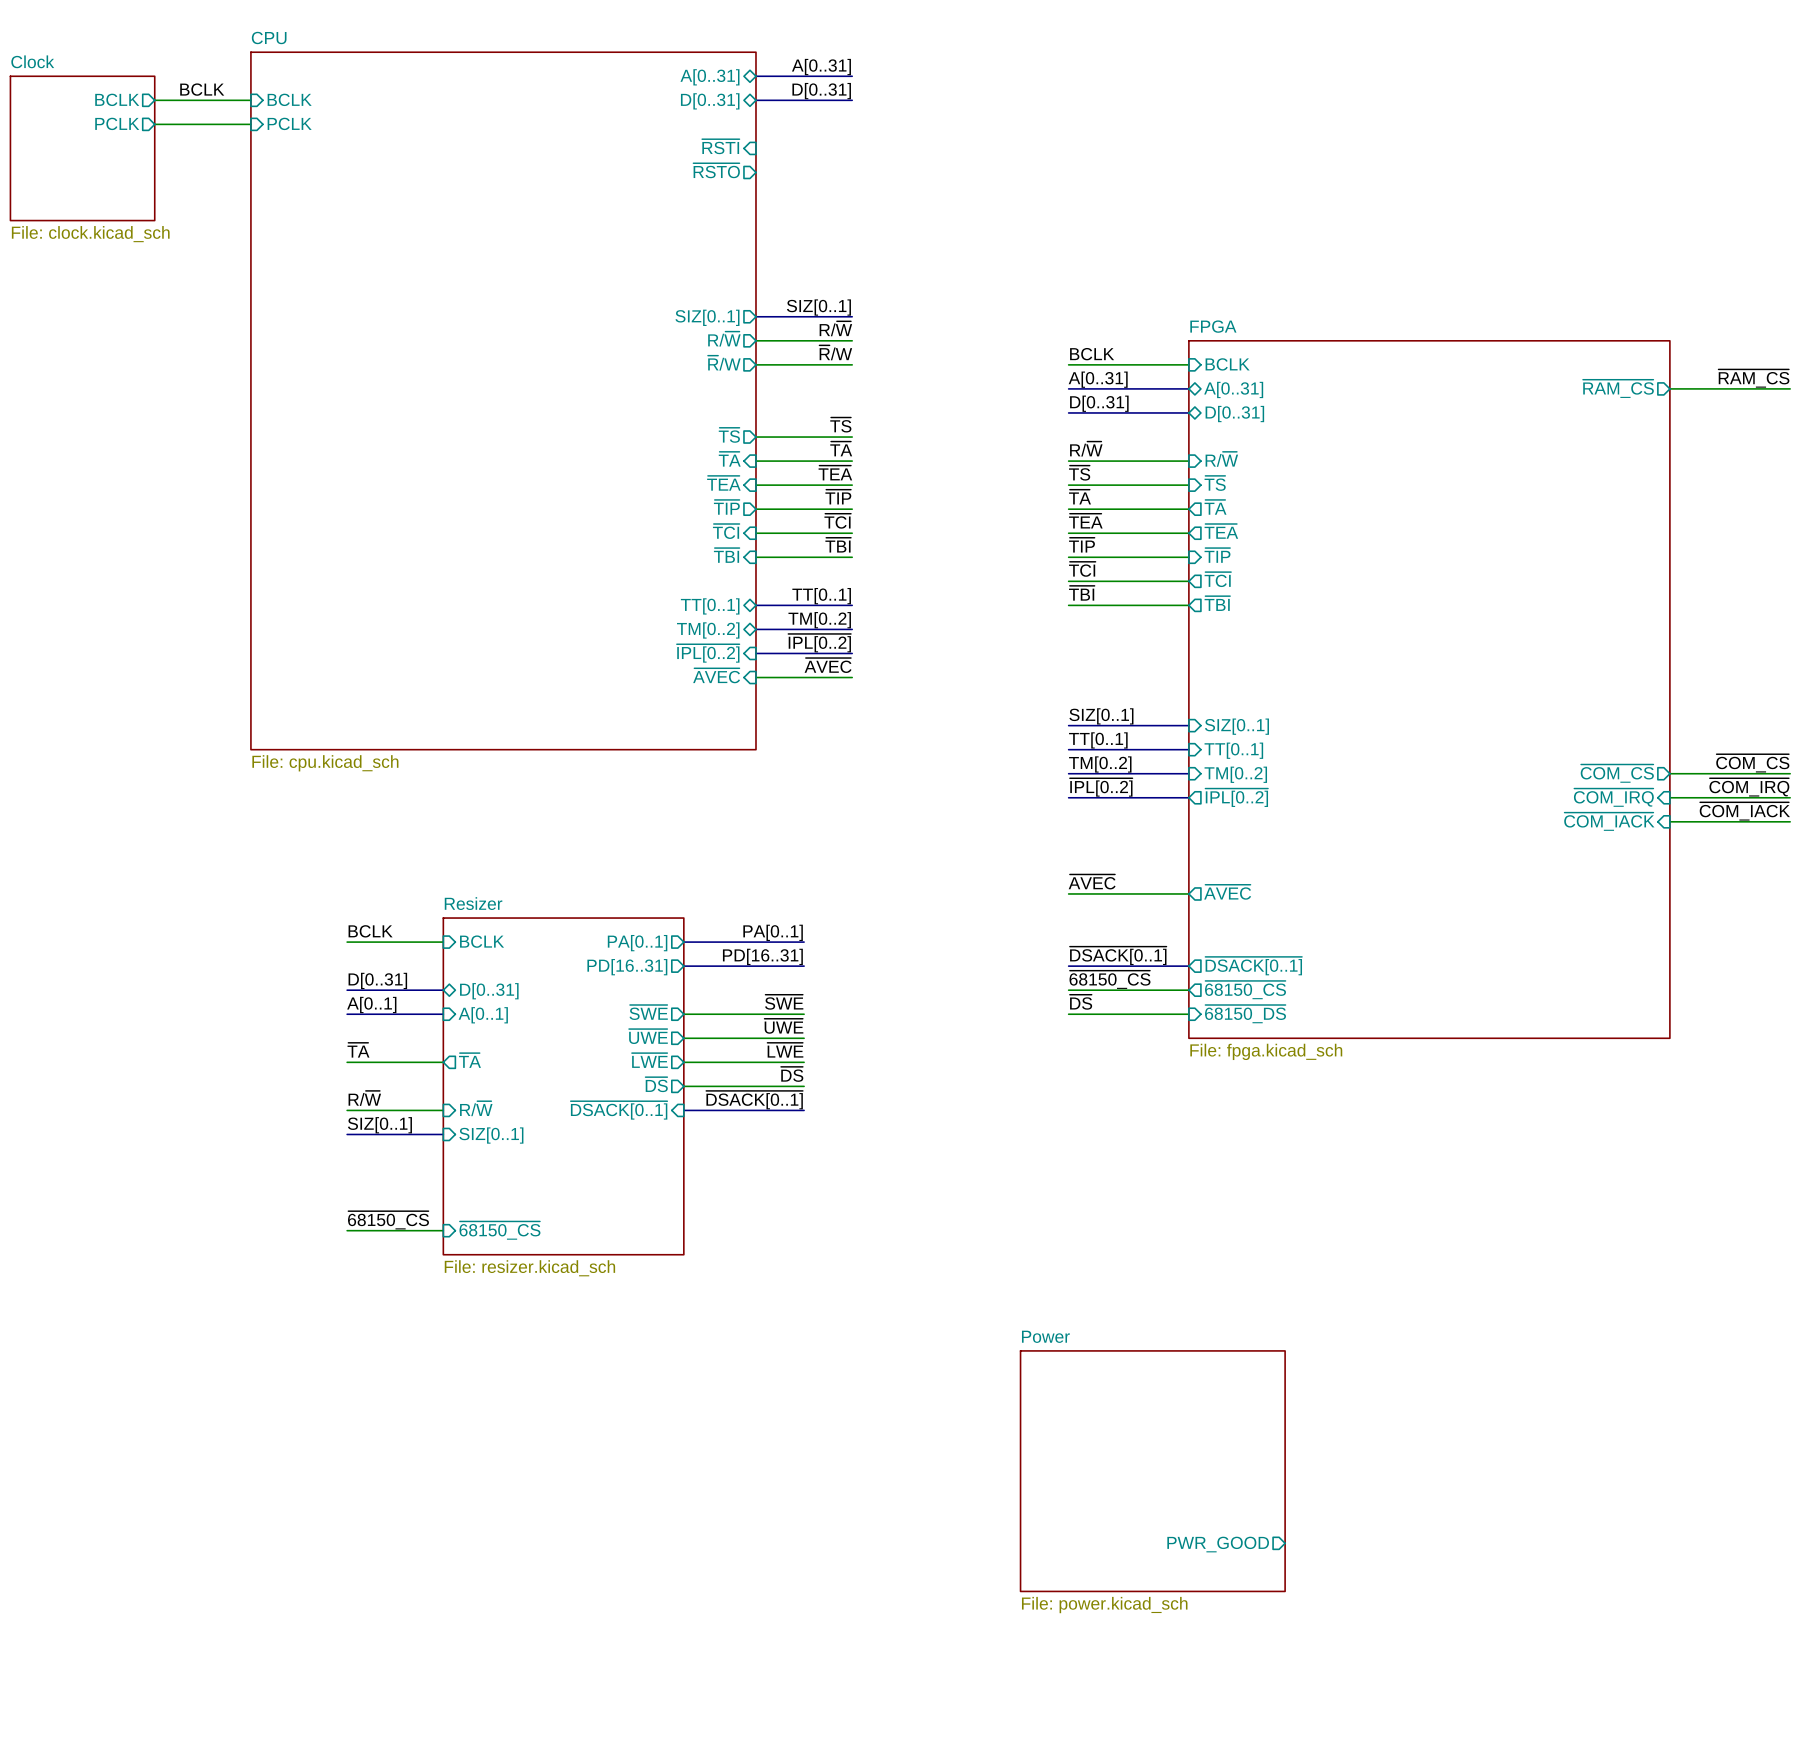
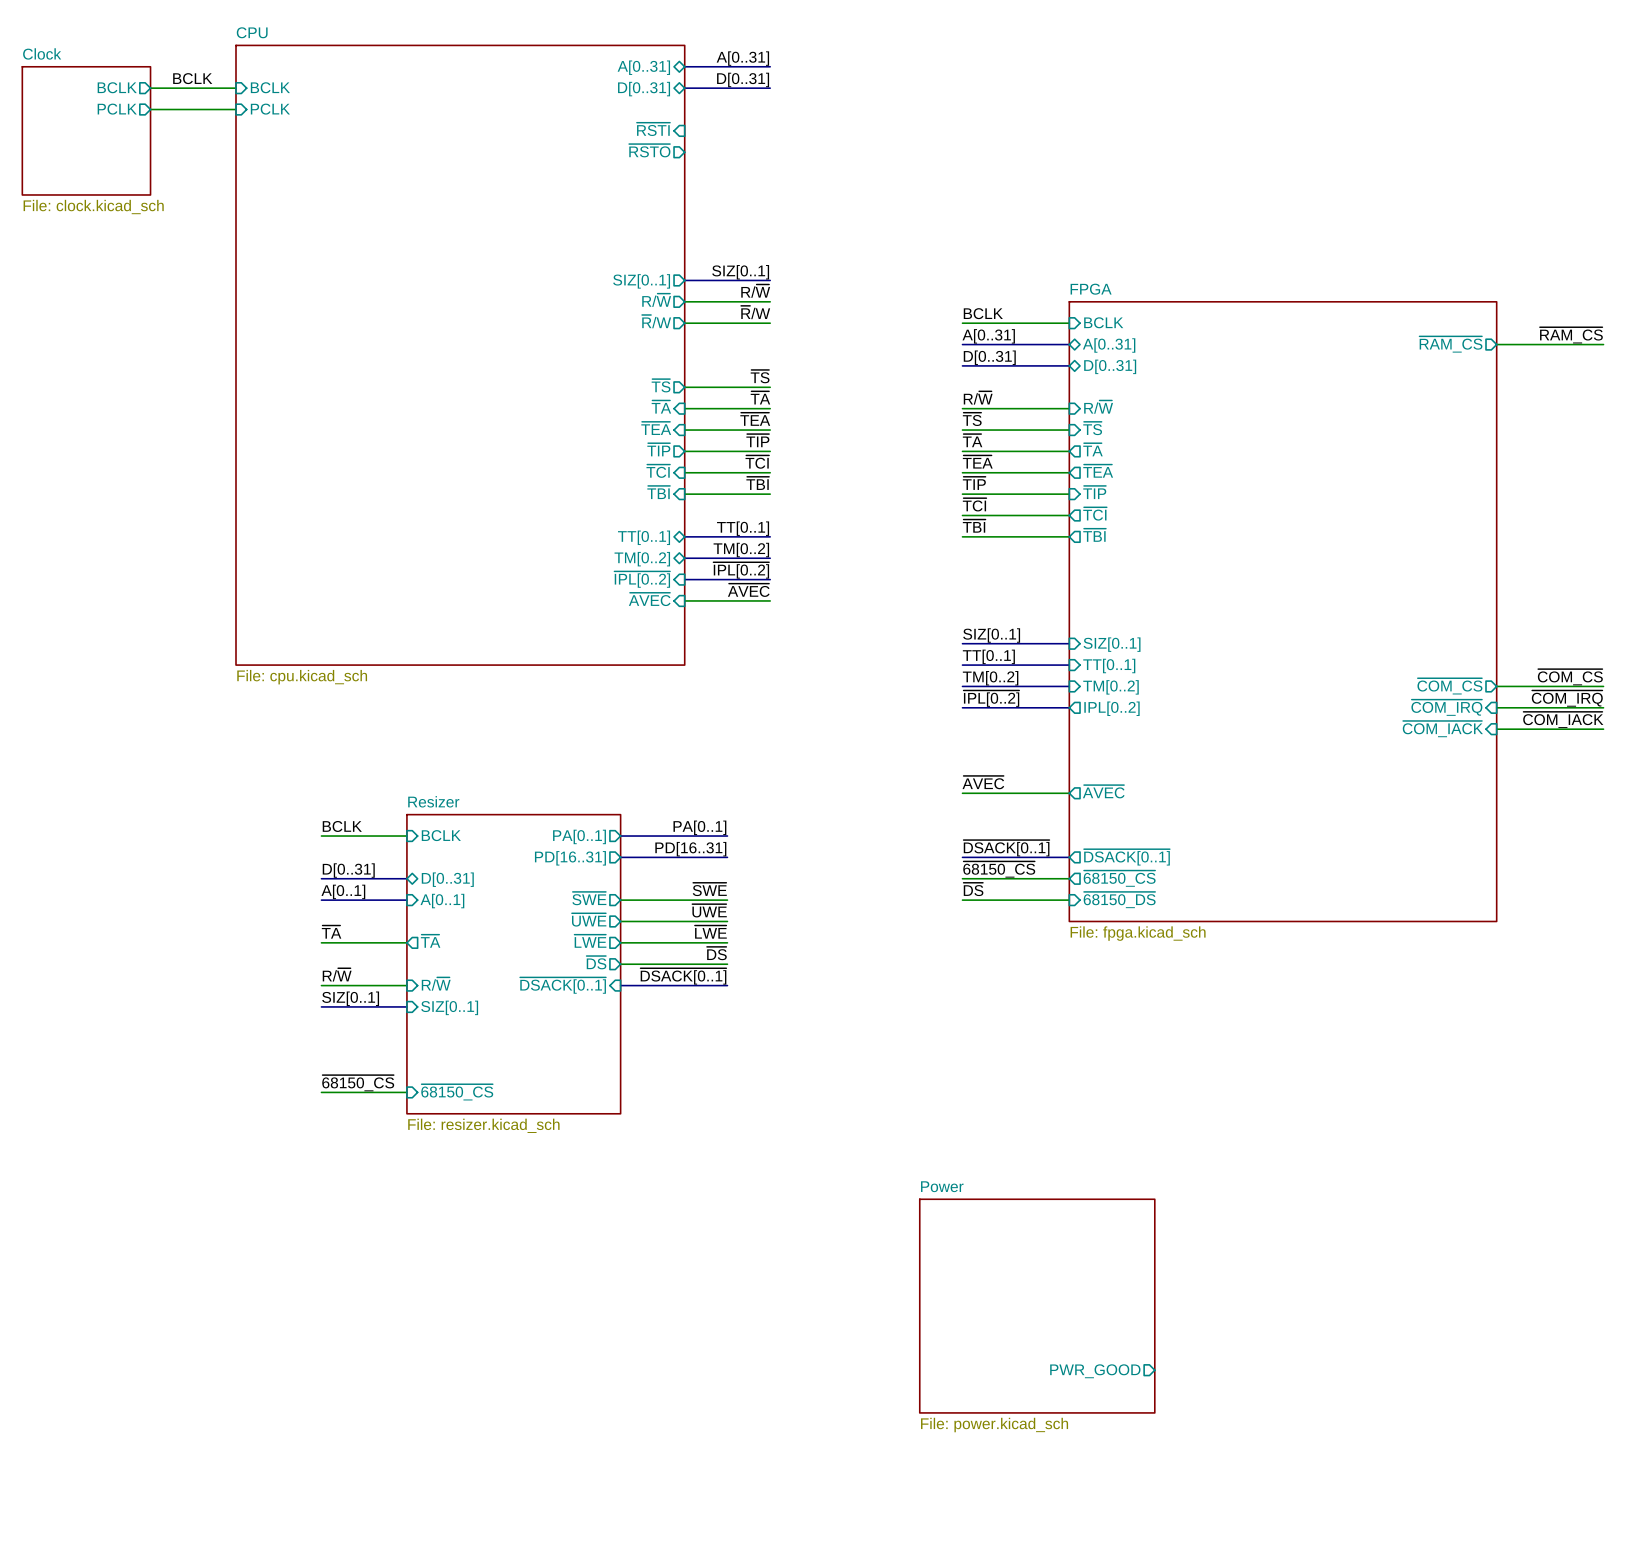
sheet pin: ~{IPL[0..2]} (1236, 797) -> IPL[0..2] (1111, 708)

